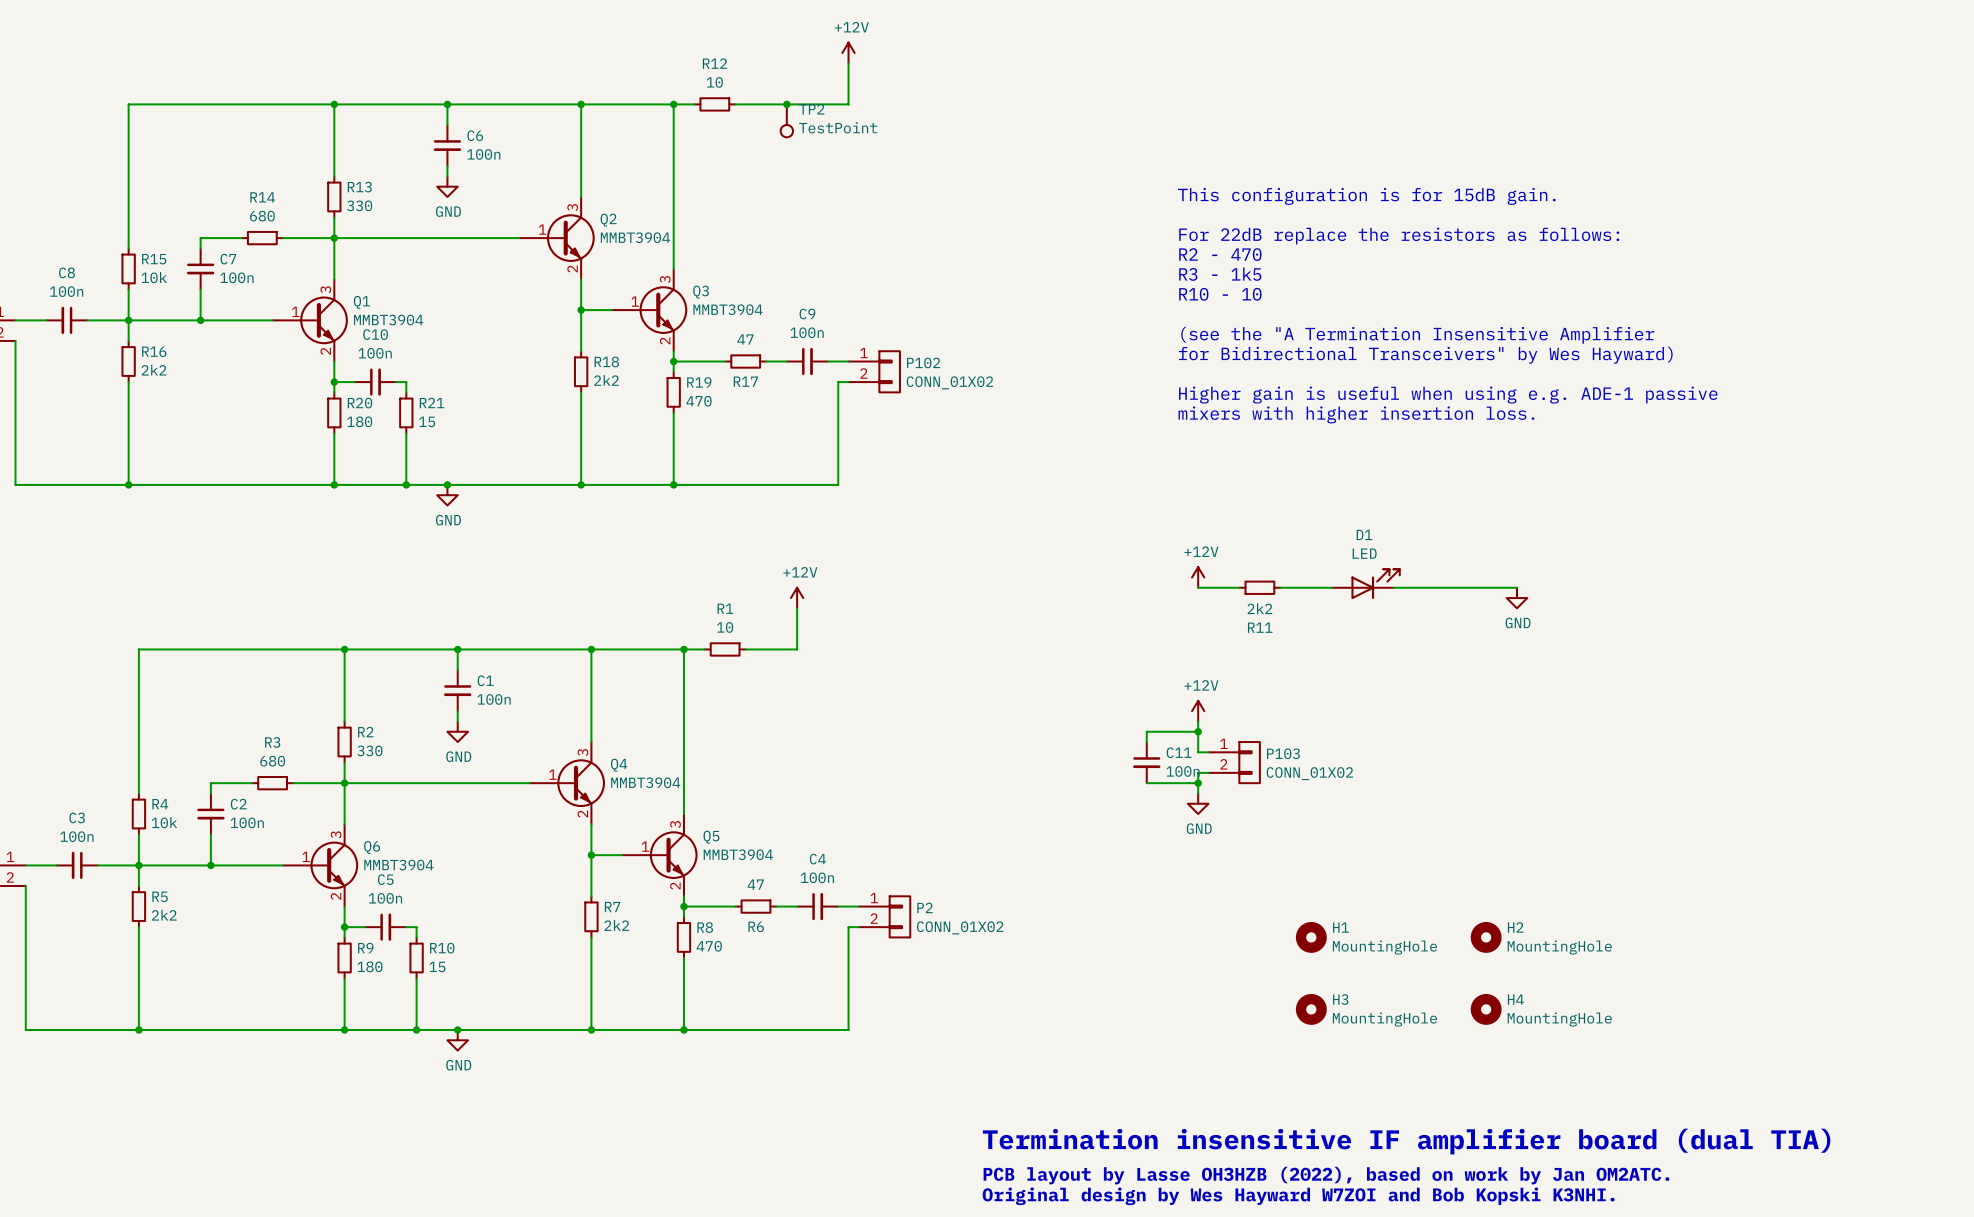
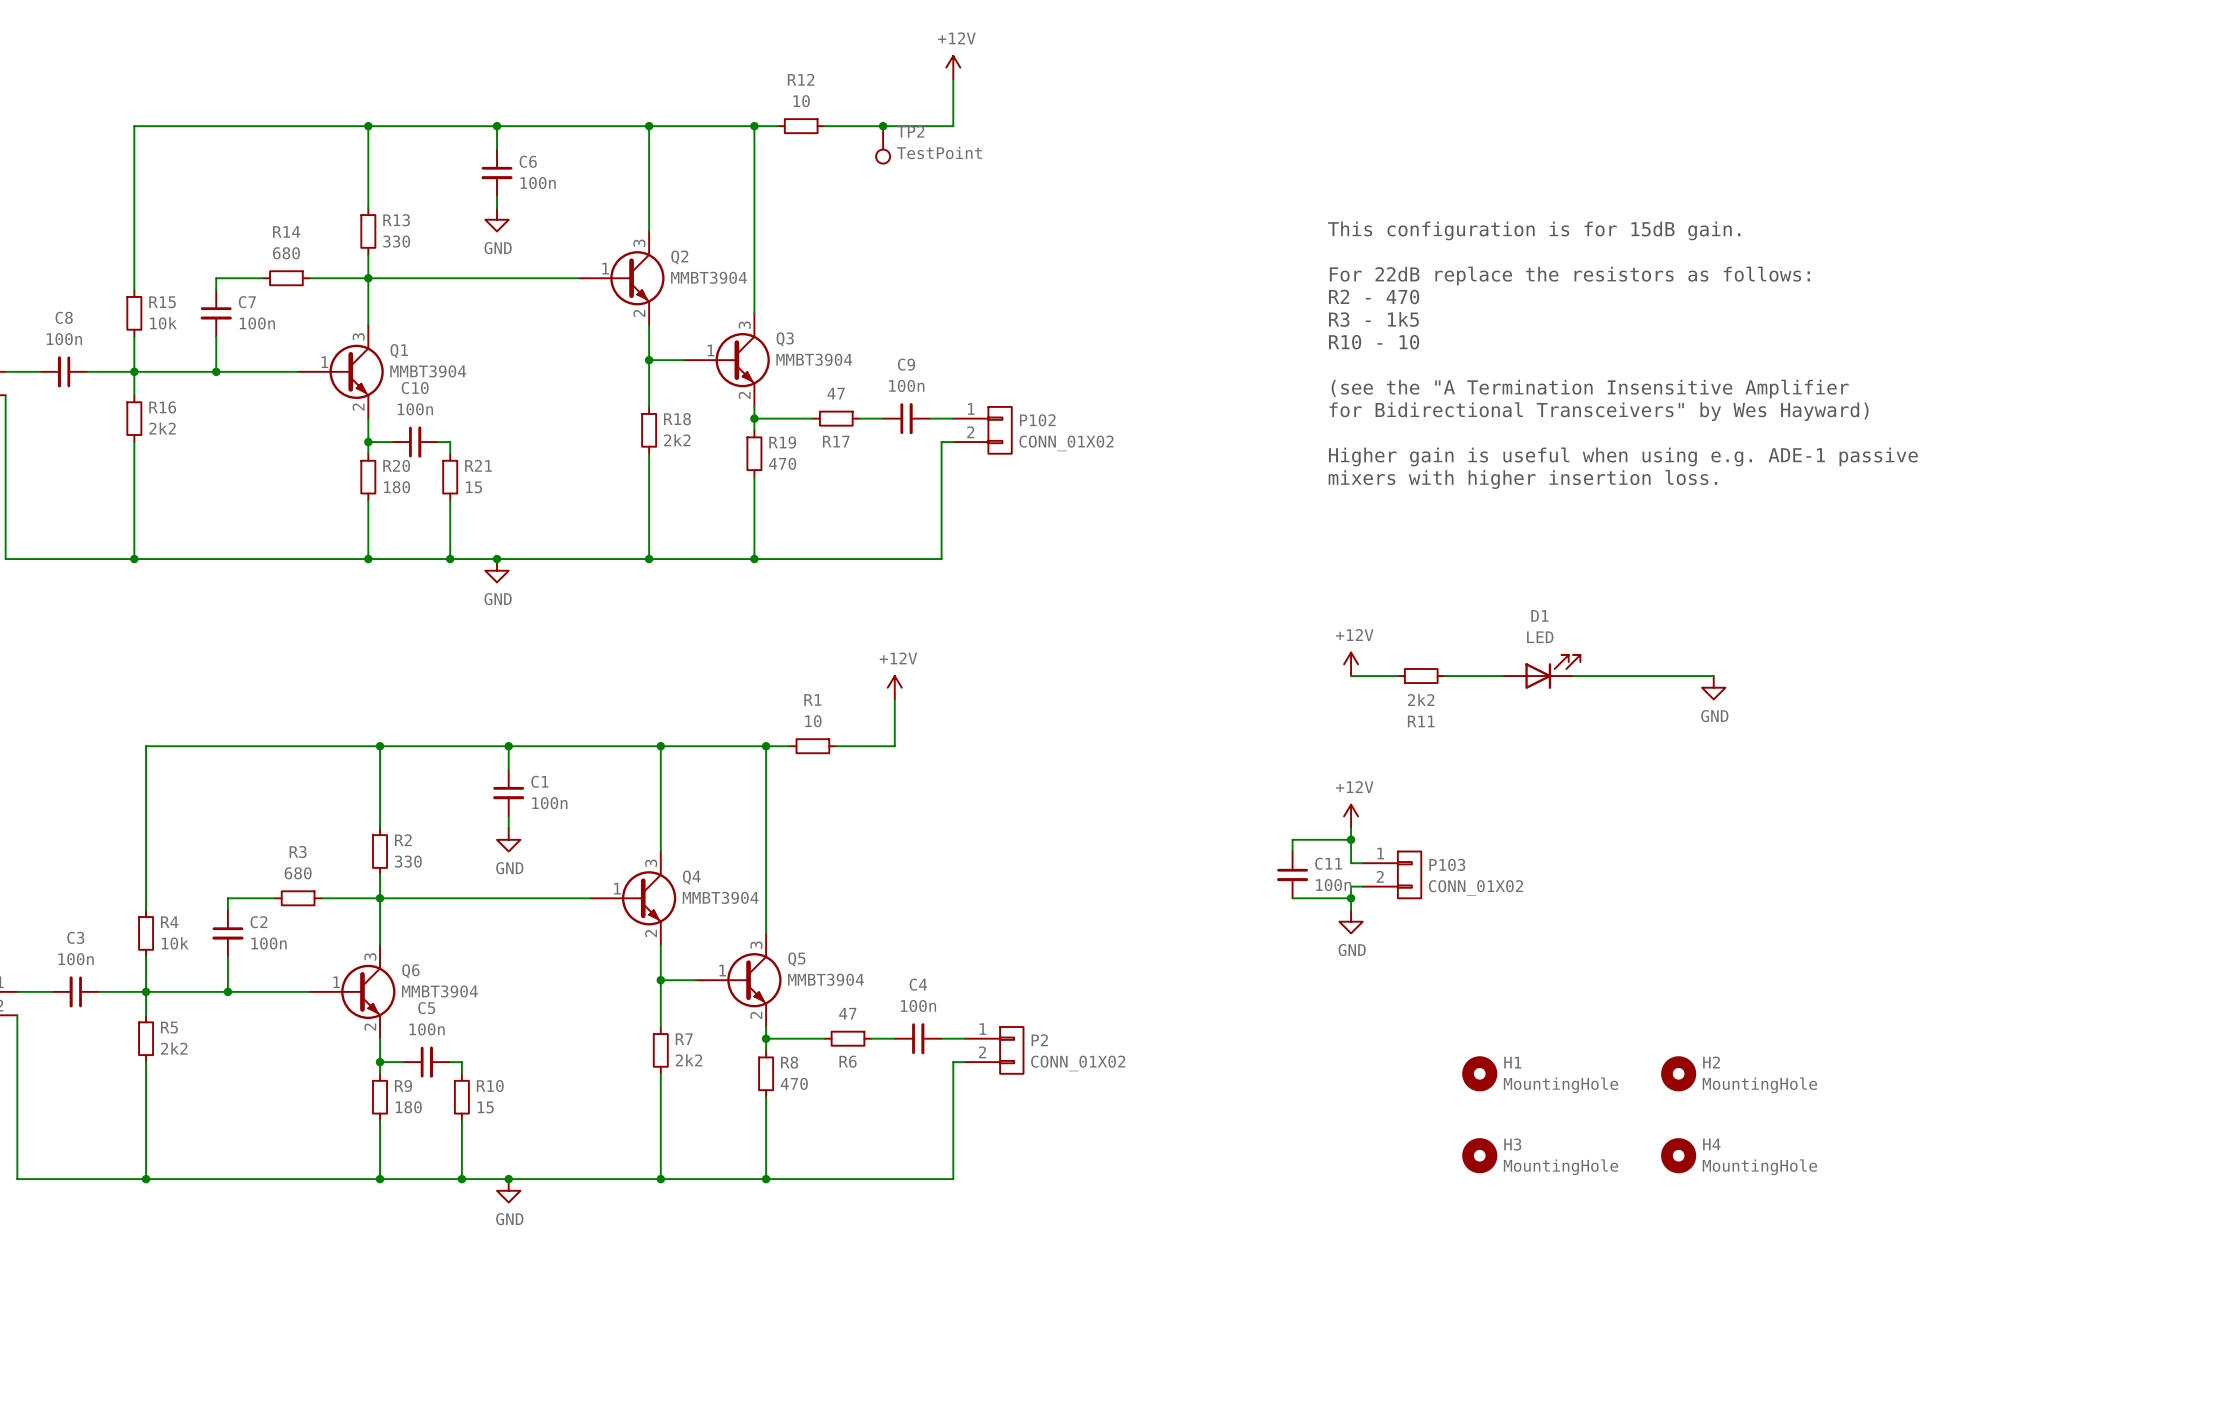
text: Termination insensitive IF amplifier board (dual TIA) (1406, 1141) -> none
text: PCB layout by Lasse OH3HZB (2022), based on work by Jan OM2ATC. (1326, 1175) -> none
text: Original design by Wes Hayward W7ZOI and Bob Kopski K3NHI. (1298, 1196) -> none

